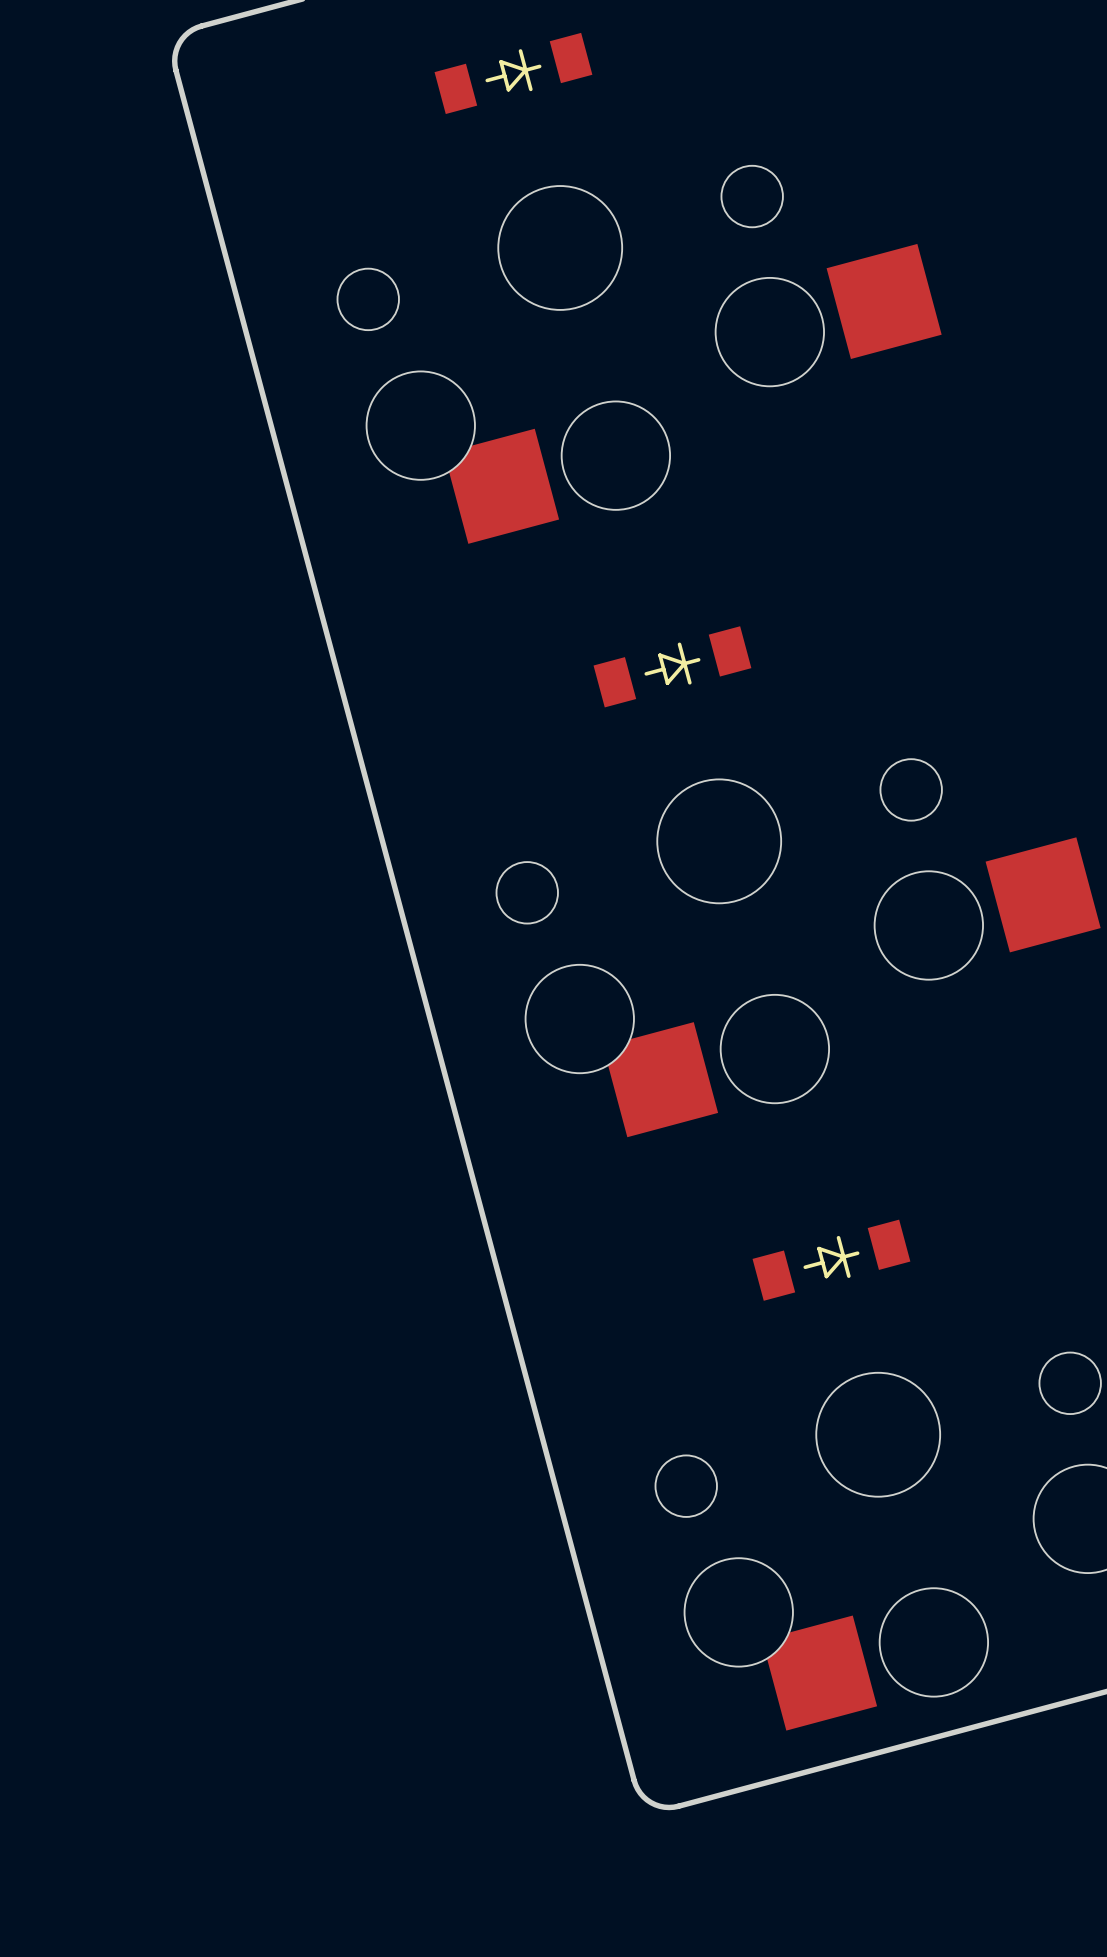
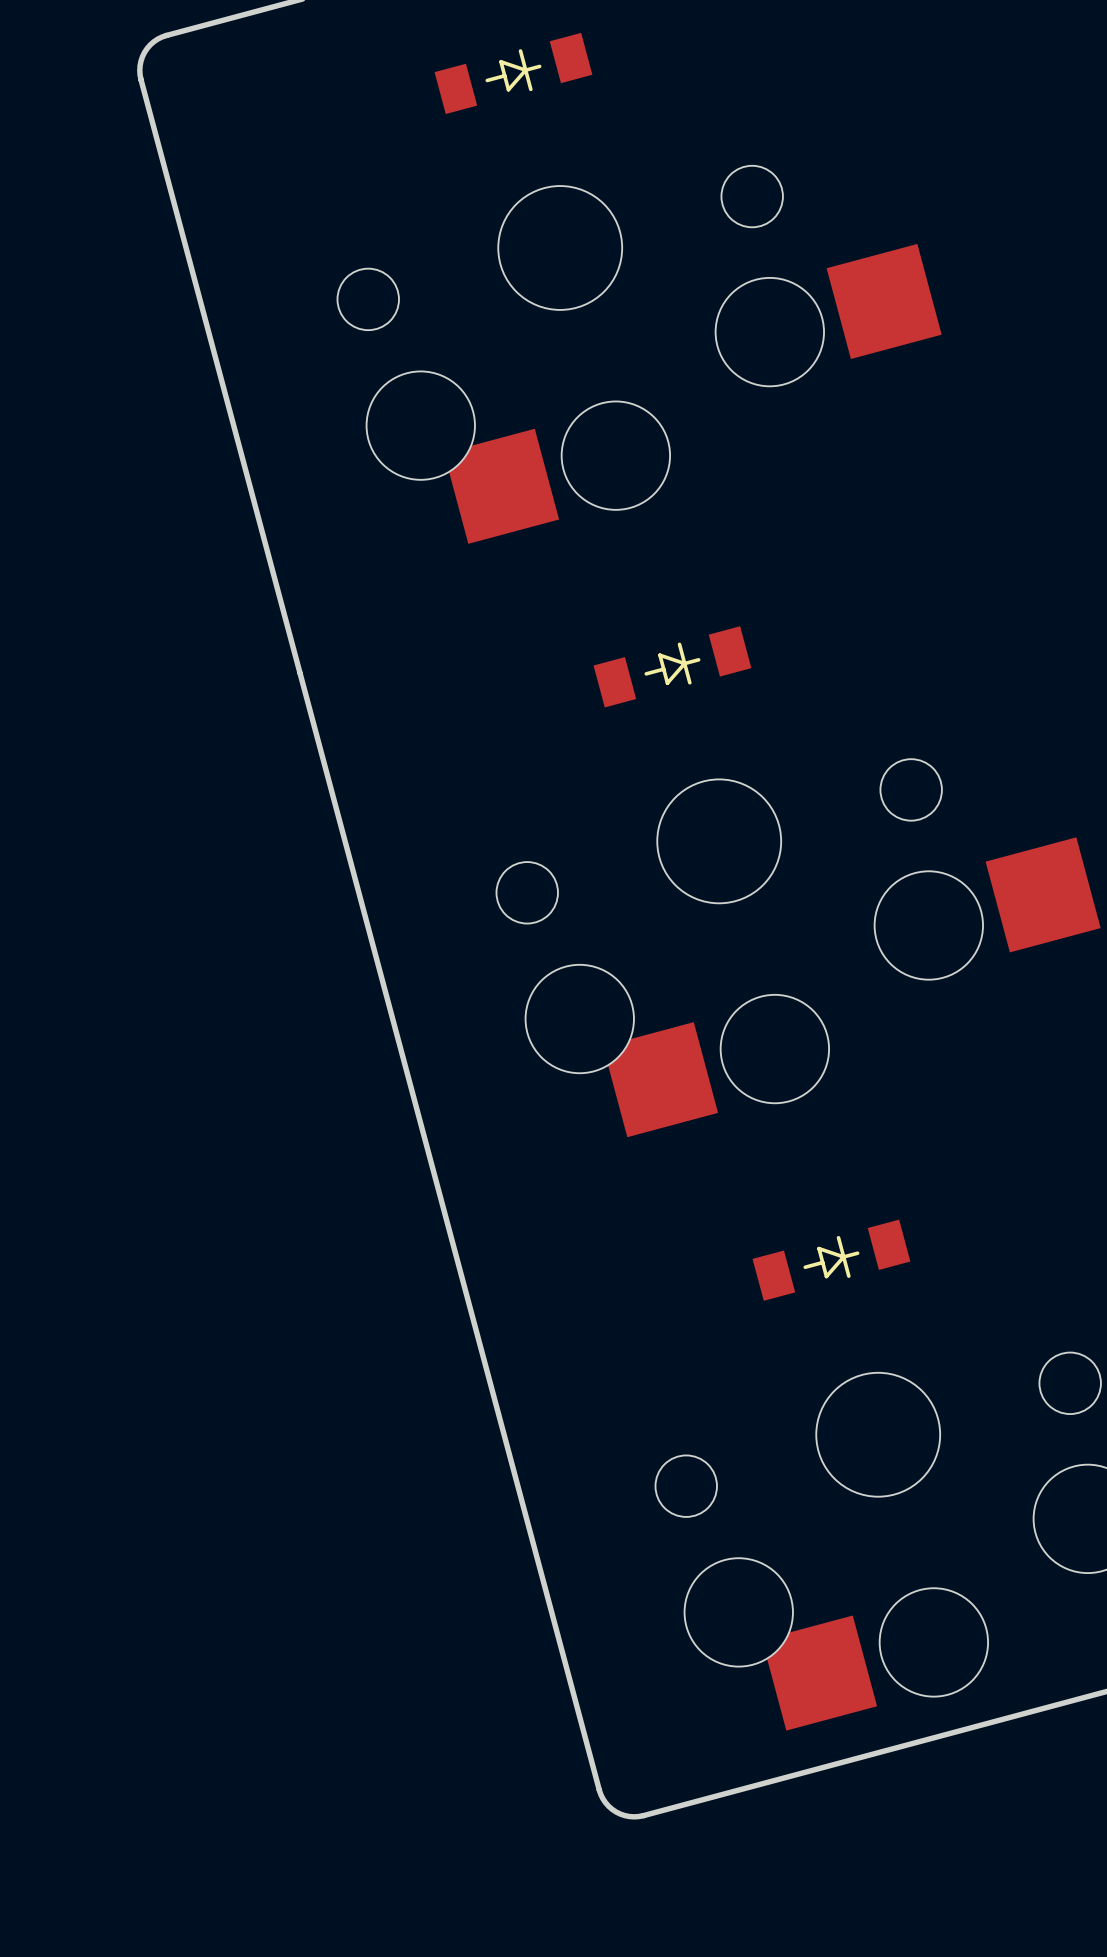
board edge: (201, 26) (188, 32) (179, 42) (175, 56) (175, 70) (634, 1780) (640, 1793) (651, 1802) (664, 1807) (678, 1806) -> (201, 26) (162, 36) (150, 44) (141, 61) (141, 79) (599, 1790) (608, 1806) (624, 1815) (638, 1816) (678, 1806)

